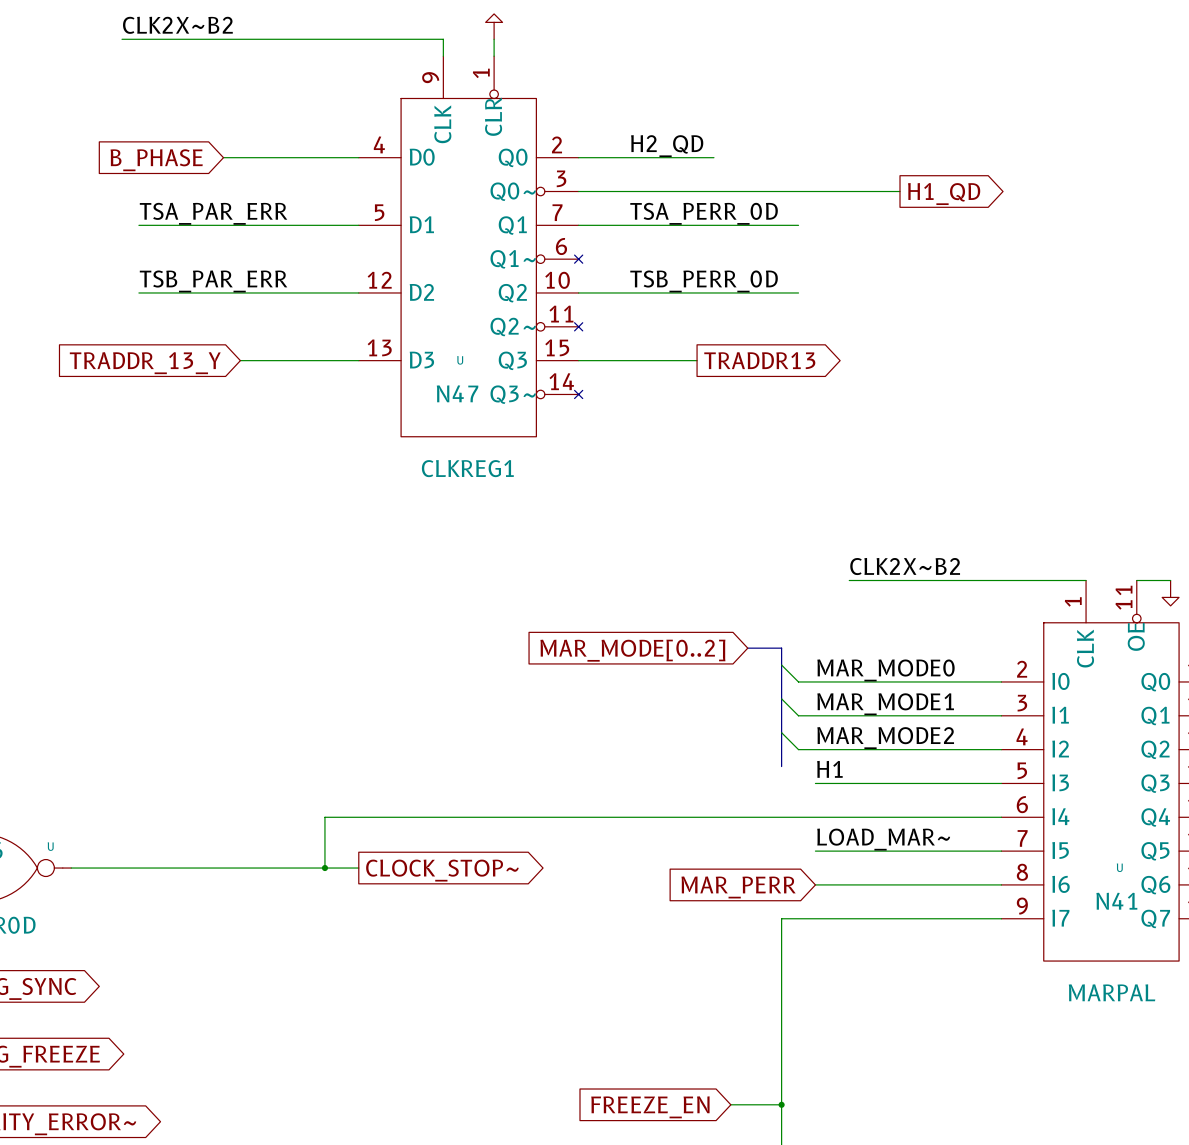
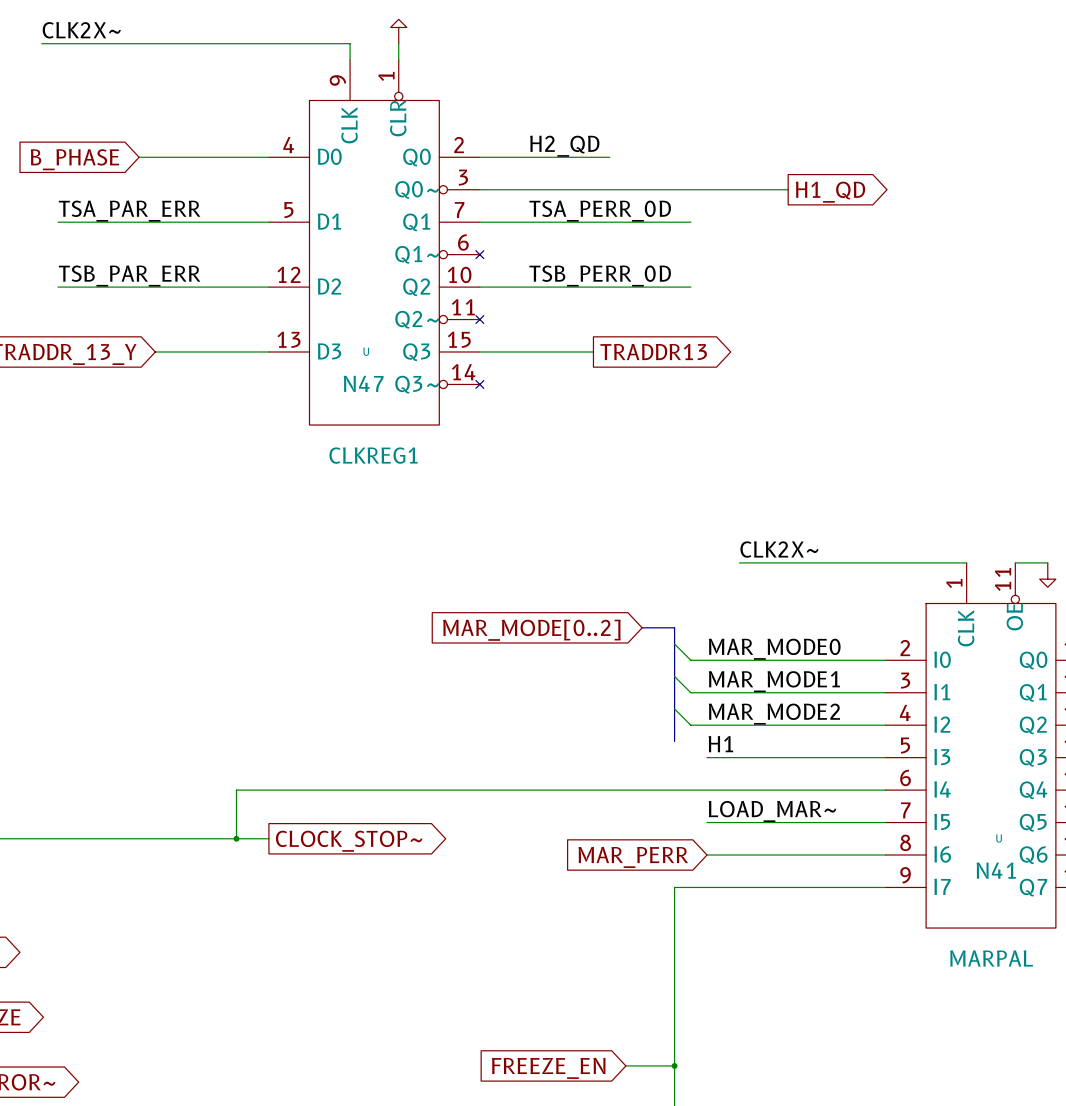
label: CLK2X~B2 (177, 25) -> CLK2X~ (81, 30)
label: CLK2X~B2 (905, 566) -> CLK2X~ (779, 549)

